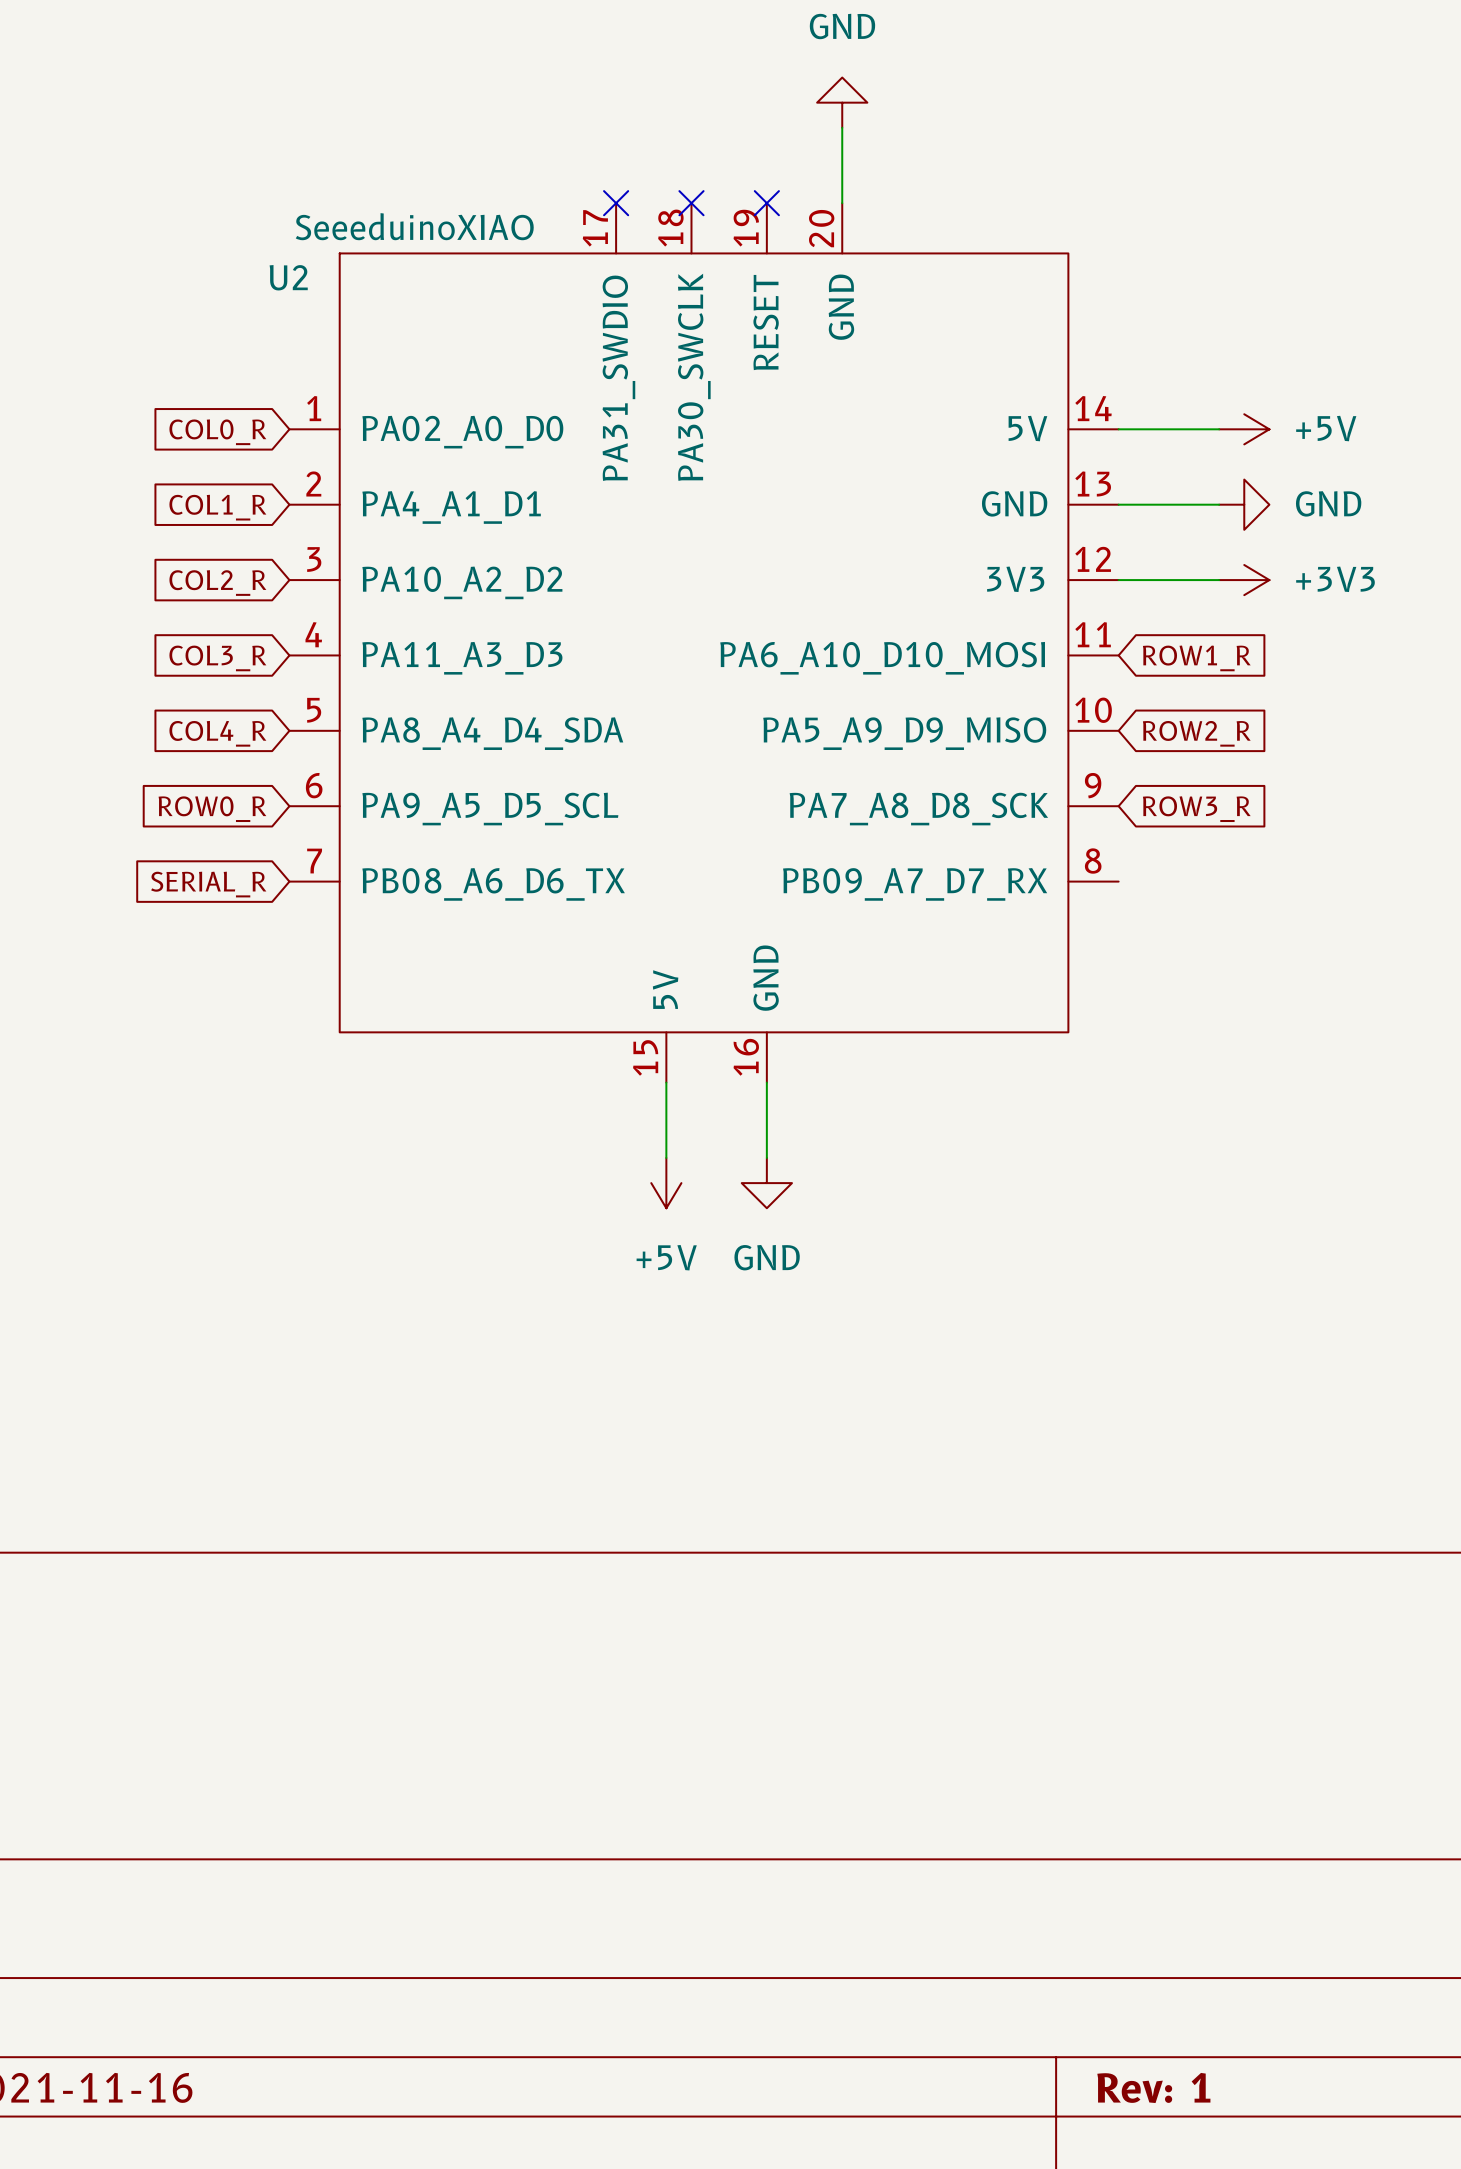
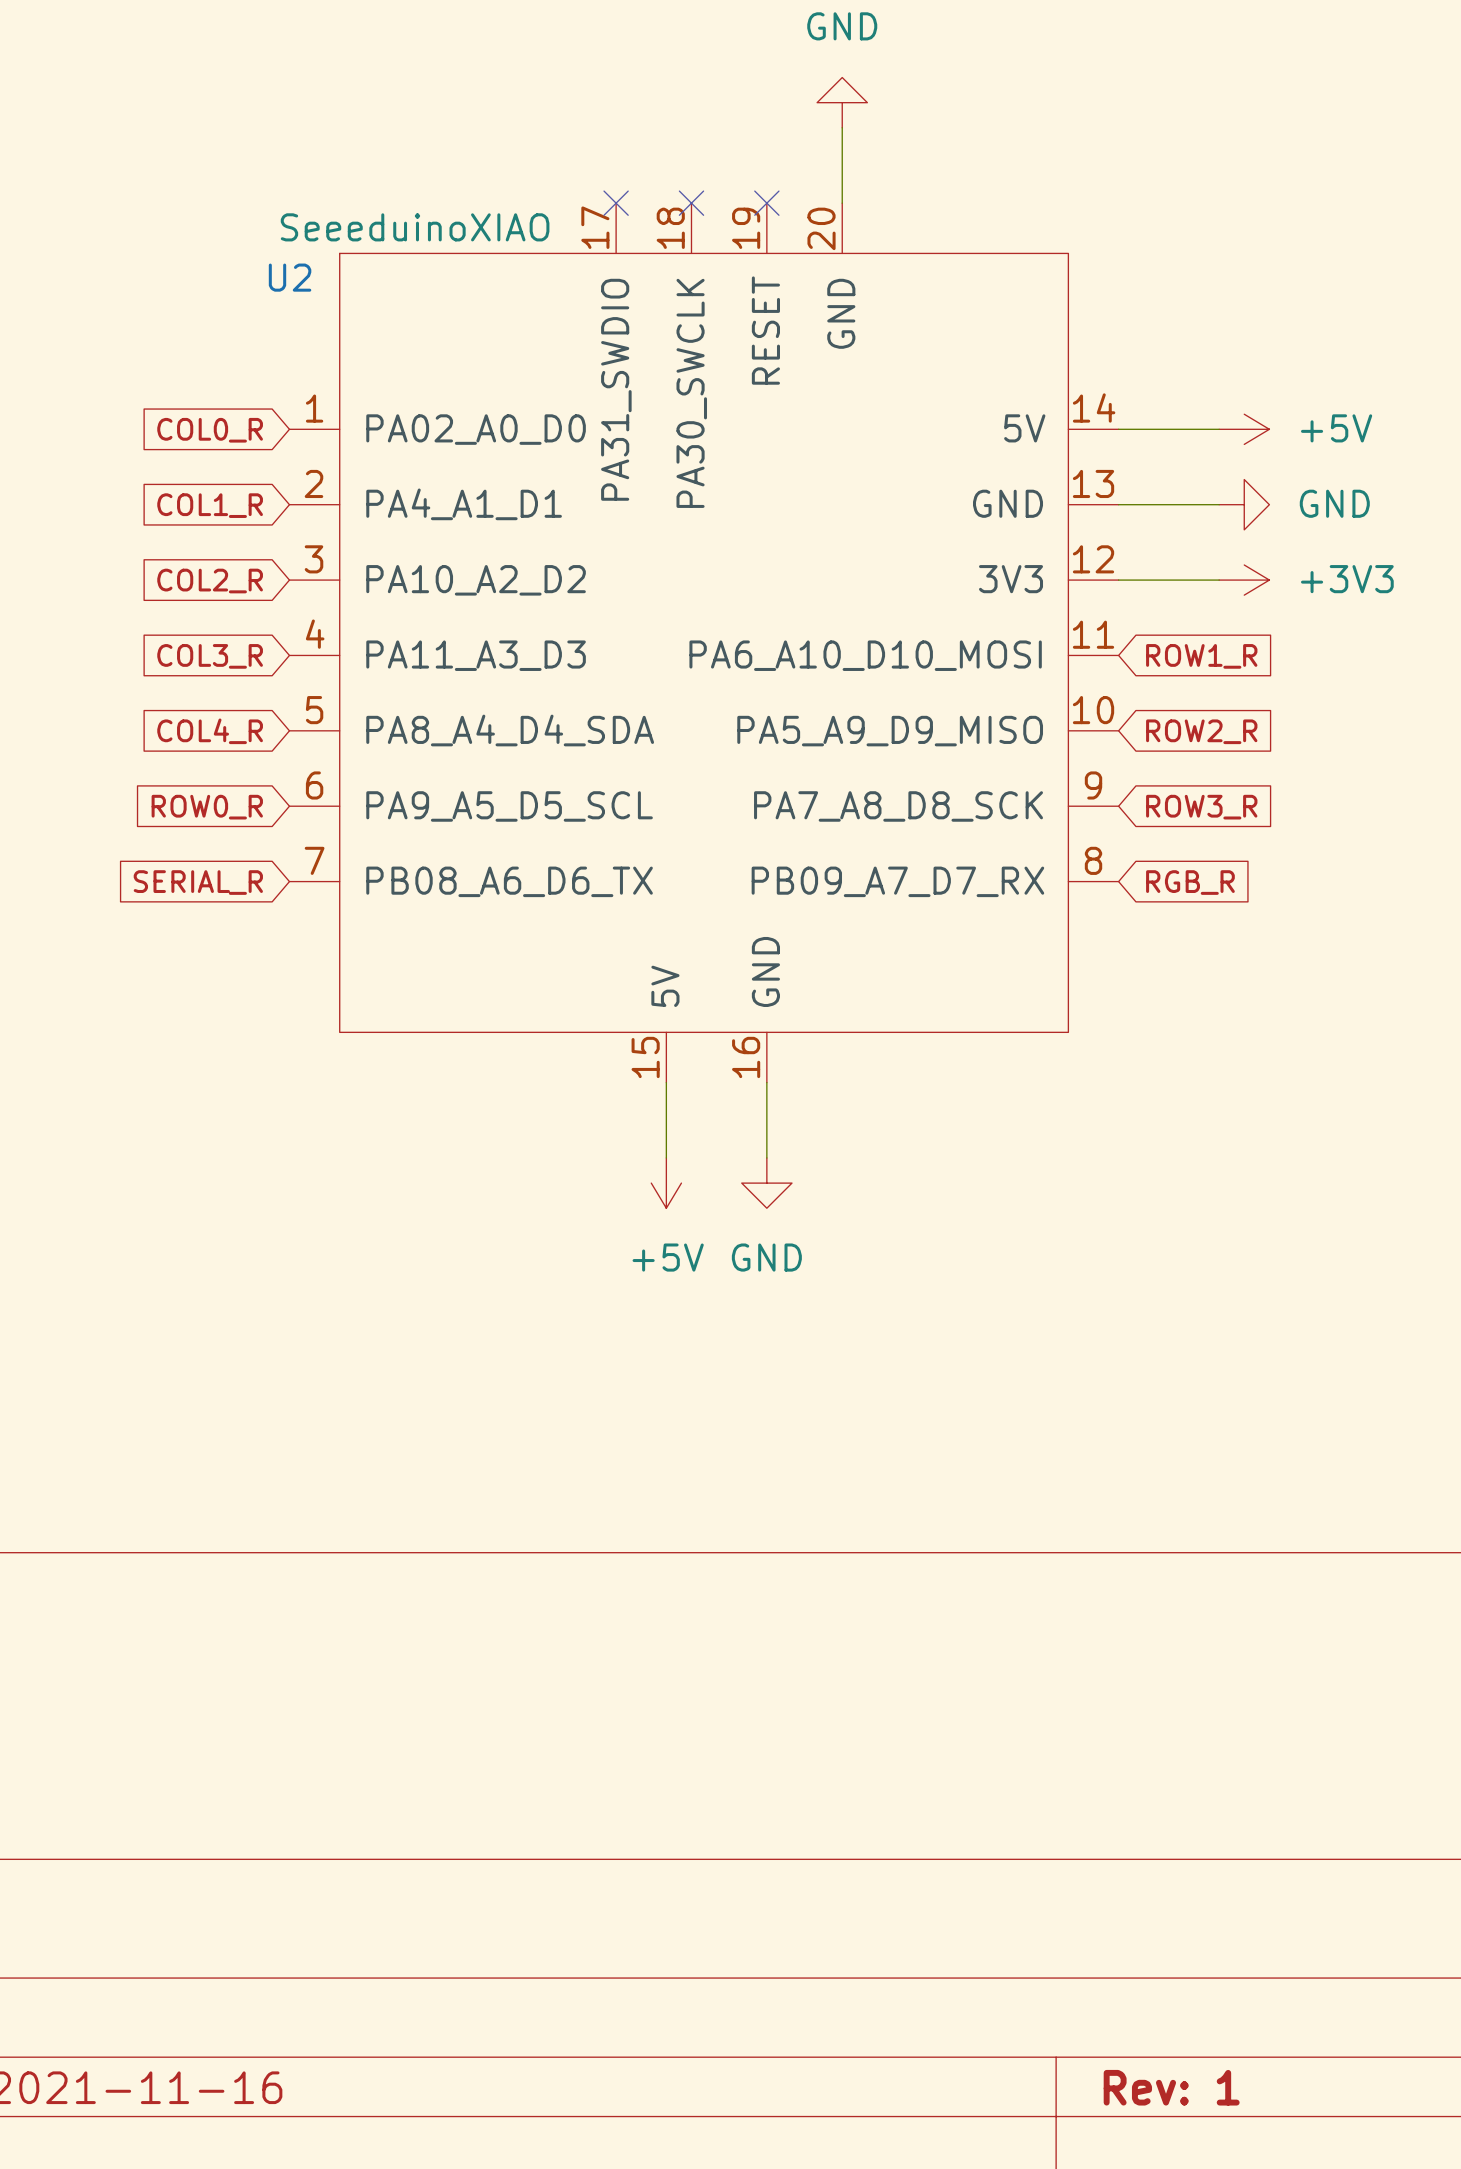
global label: none -> RGB_R (1190, 882)

